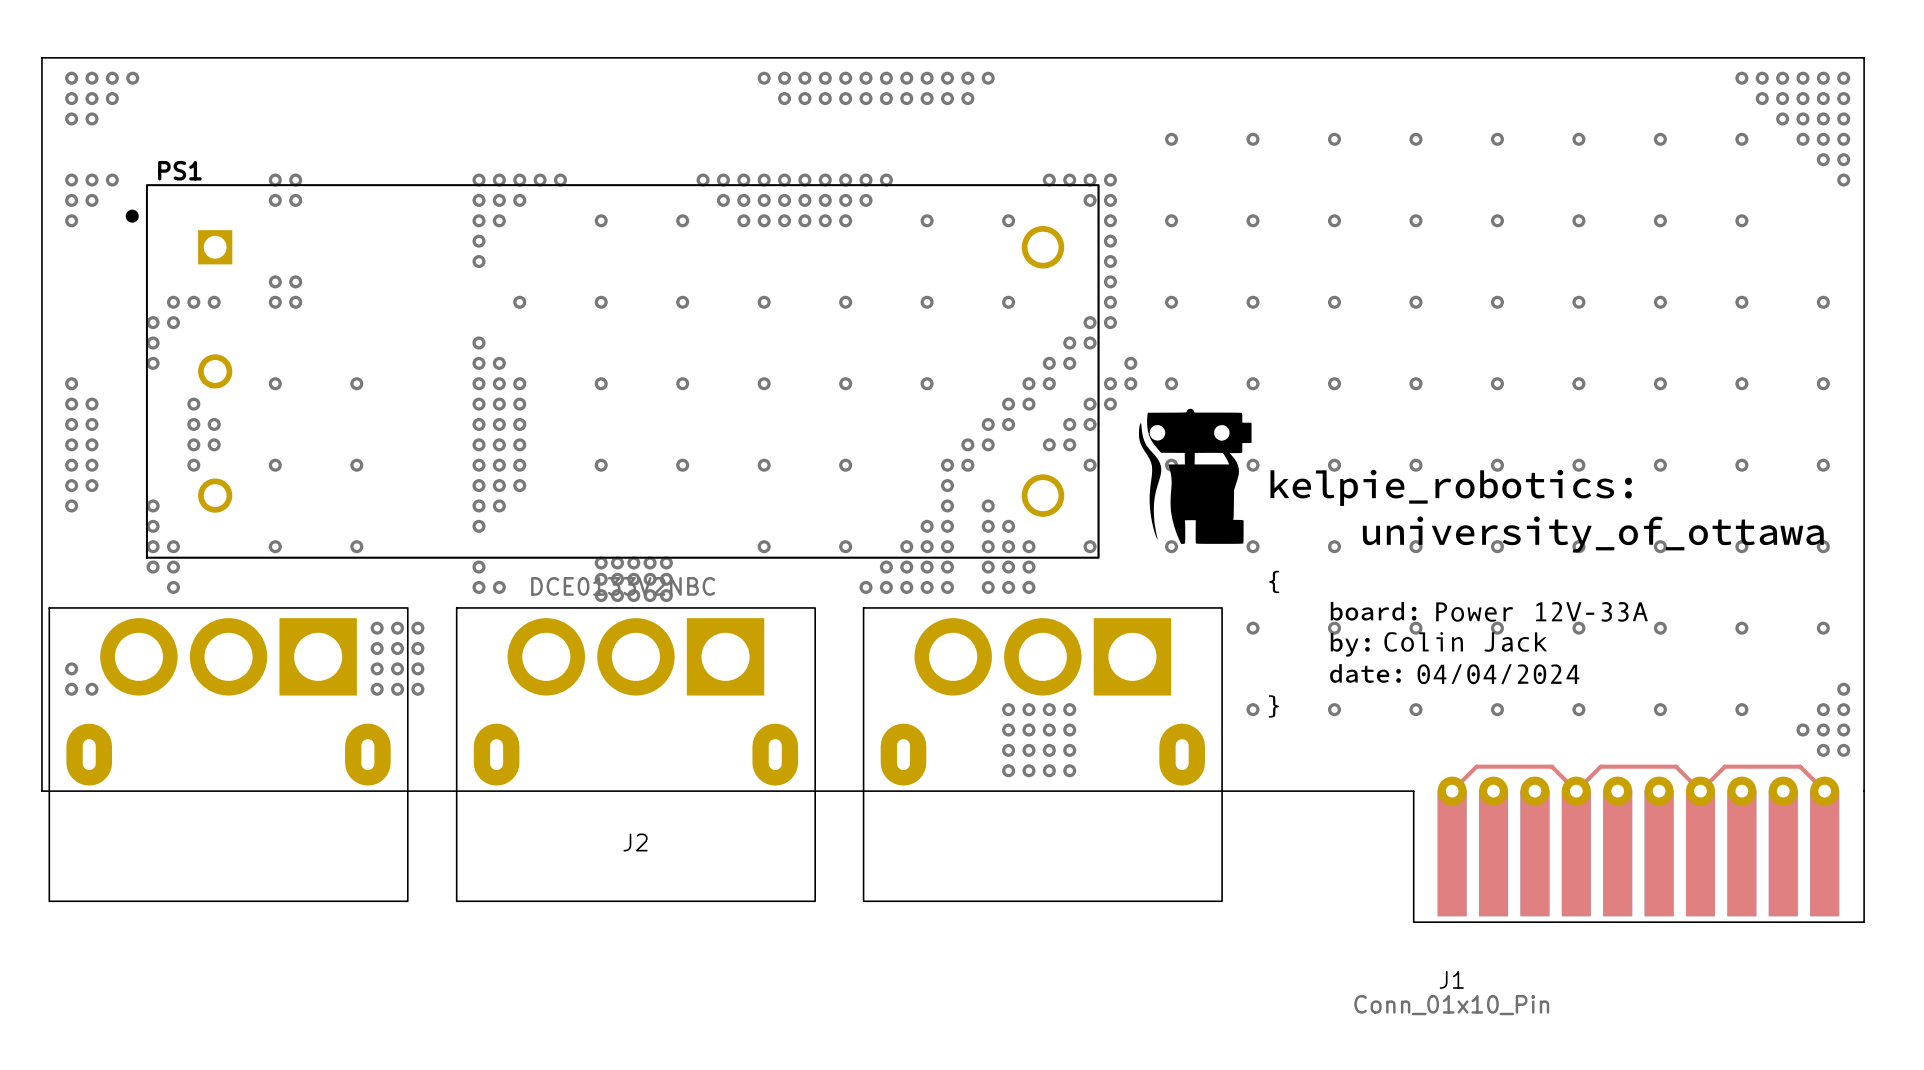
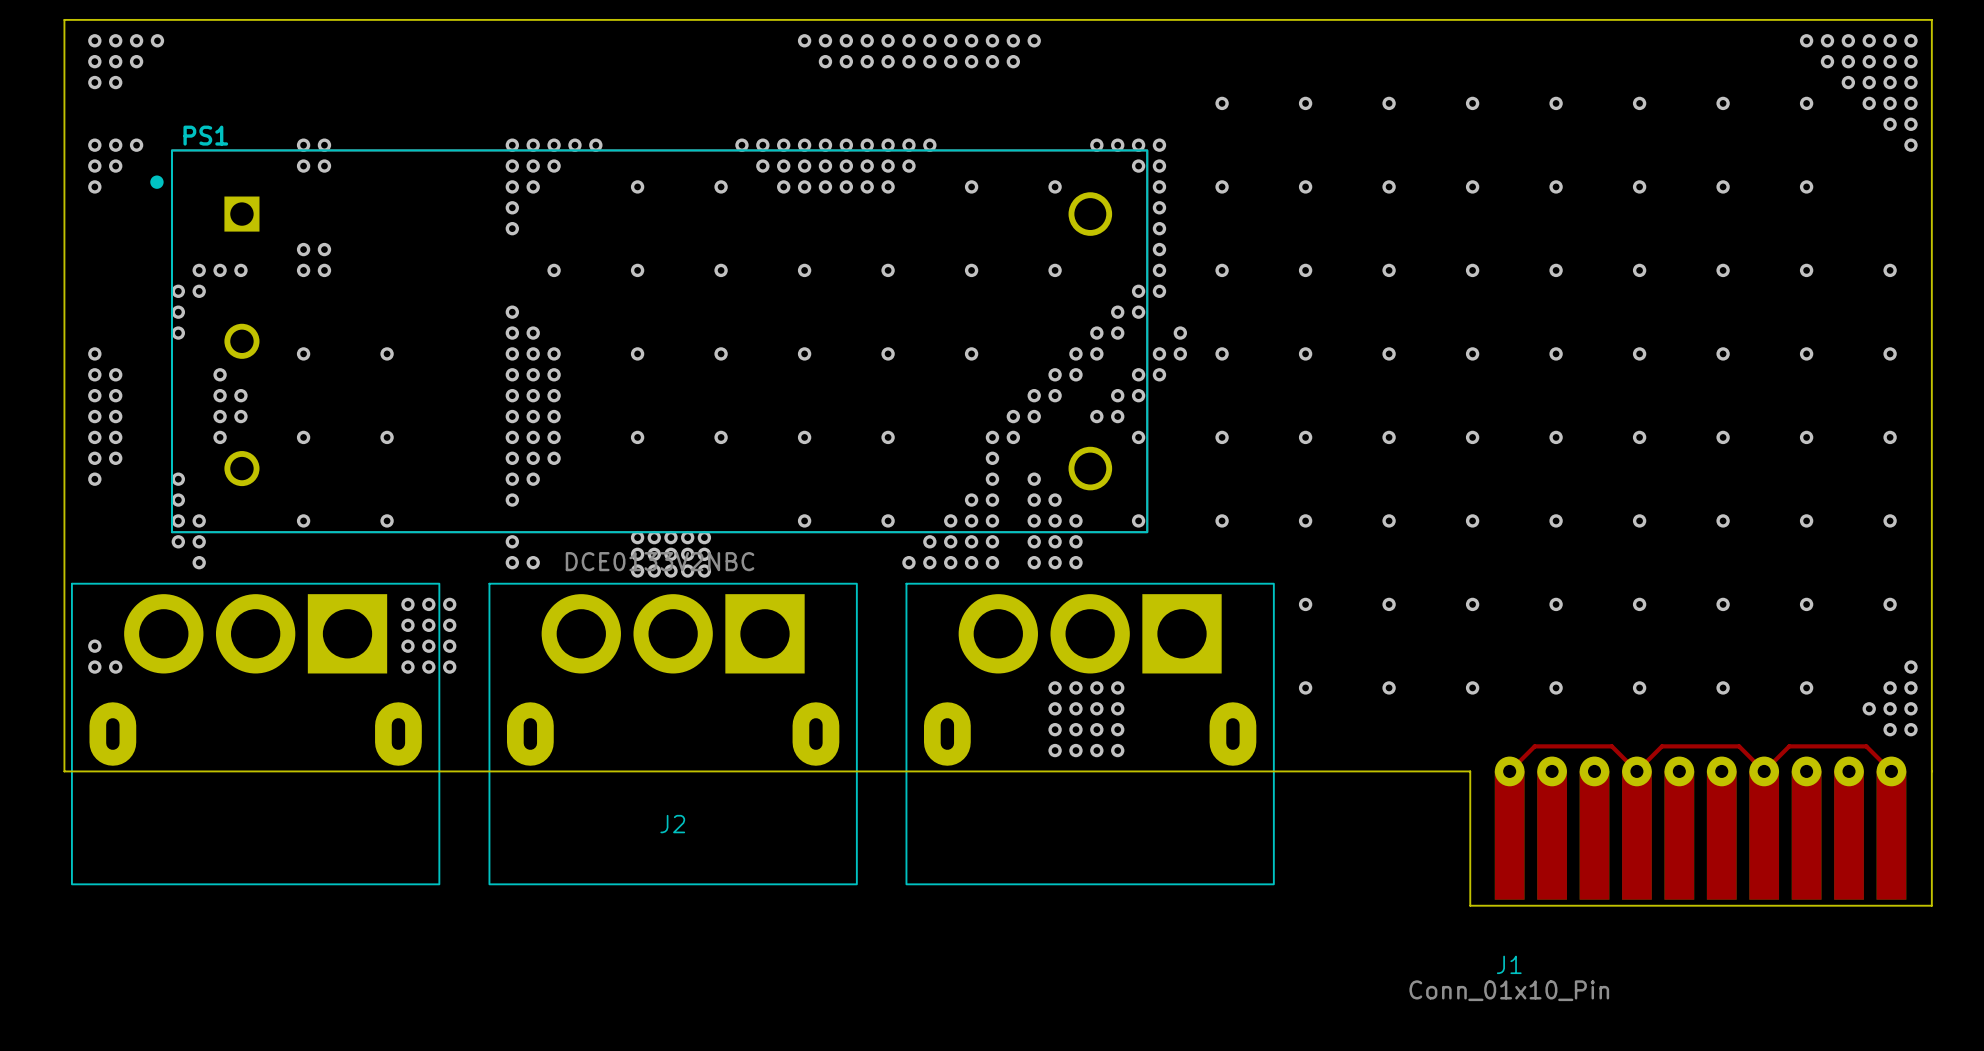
drawing: [1138, 408, 1824, 718] -> none

